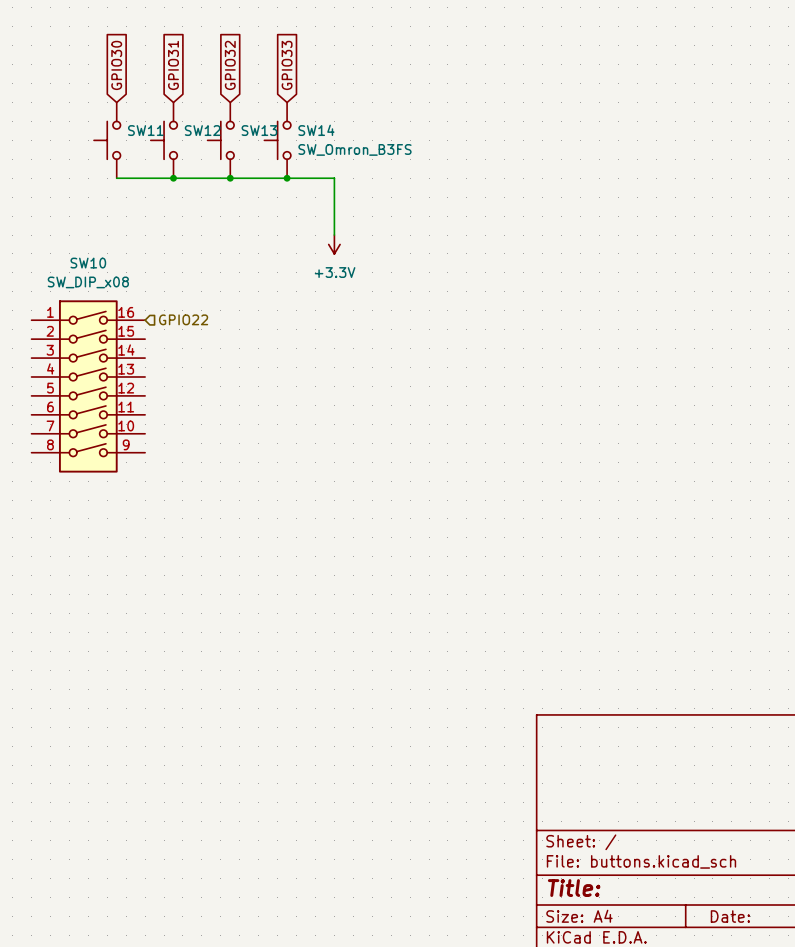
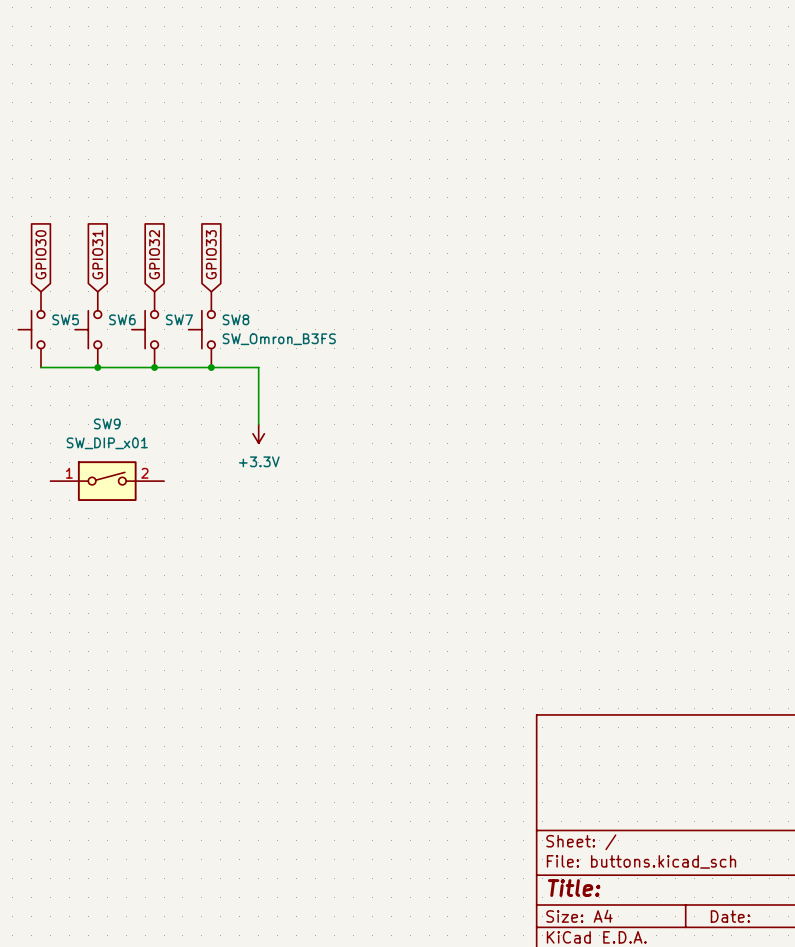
global label: GPIO30 (116, 65) -> none
global label: GPIO31 (173, 65) -> none
global label: GPIO32 (230, 65) -> none
global label: GPIO33 (287, 65) -> none
SW11: (107, 140) -> none
SW12: (164, 140) -> none
SW13: (220, 140) -> none
SW14: SW_Omron_B3FS (277, 140) -> none
wire: (116, 178) (334, 178) (334, 235) -> none
junction: (173, 178) -> none
junction: (230, 178) -> none
junction: (287, 178) -> none
power symbol: +3.3V (334, 244) -> none
global label: none -> GPIO30 (41, 254)
global label: none -> GPIO31 (97, 254)
global label: none -> GPIO32 (154, 254)
global label: none -> GPIO33 (211, 254)
hierarchical label: GPIO22 (183, 319) -> none
SW5: none -> (31, 329)
SW6: none -> (88, 329)
SW7: none -> (145, 329)
SW8: none -> SW_Omron_B3FS (201, 329)
wire: none -> (41, 367) (258, 367) (258, 424)
junction: none -> (97, 367)
junction: none -> (154, 367)
junction: none -> (211, 367)
SW10: SW_DIP_x08 (88, 386) -> none
power symbol: none -> +3.3V (258, 433)
SW9: none -> SW_DIP_x01 (107, 481)

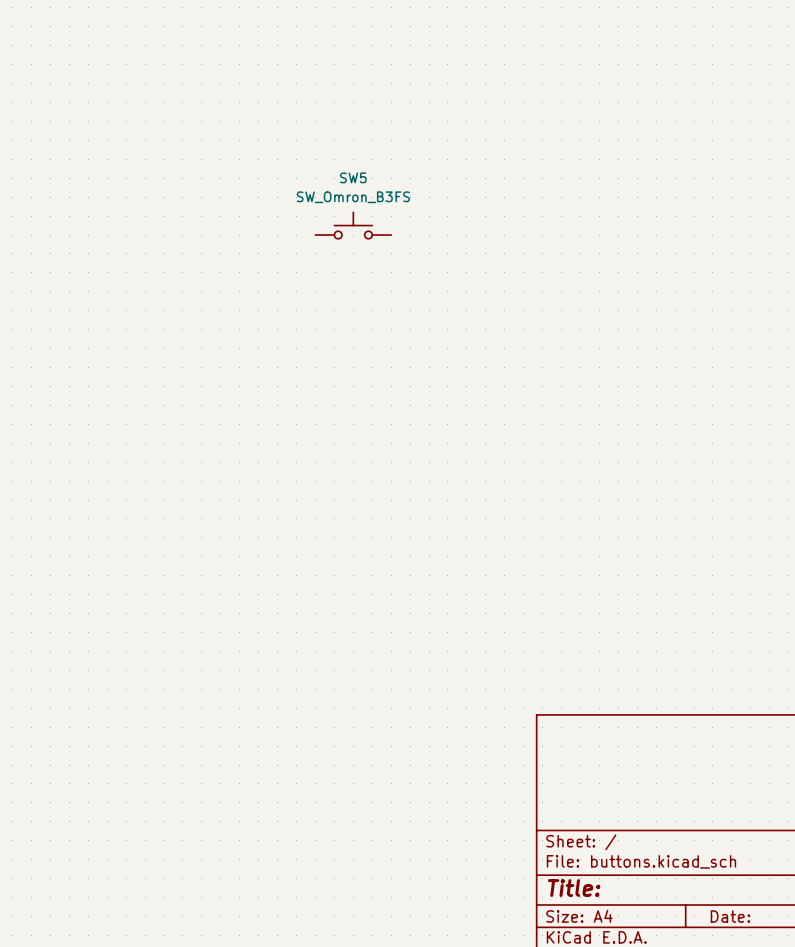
SW5 value: none -> SW_Omron_B3FS (353, 197)
global label: GPIO30 (41, 254) -> none
global label: GPIO31 (97, 254) -> none
global label: GPIO32 (154, 254) -> none
global label: GPIO33 (211, 254) -> none
SW5 name position: SW5 (65, 319) -> SW5 (353, 177)
SW5 rotation: 0° (31, 329) -> 90° clockwise (353, 225)
SW5 position: (31, 329) -> (353, 225)
SW6: (88, 329) -> none
SW7: (145, 329) -> none
SW8: SW_Omron_B3FS (201, 329) -> none
wire: (41, 367) (258, 367) (258, 424) -> none
junction: (97, 367) -> none
junction: (154, 367) -> none
junction: (211, 367) -> none
power symbol: +3.3V (258, 433) -> none
SW9: SW_DIP_x01 (107, 481) -> none

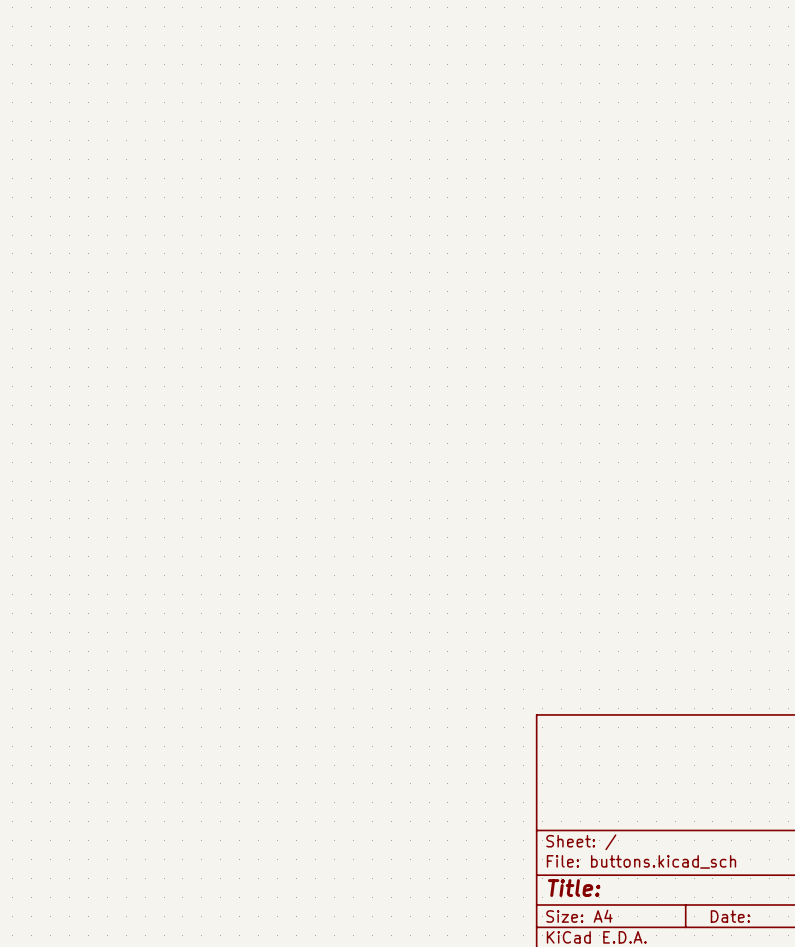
SW5: SW_Omron_B3FS (353, 225) -> none

